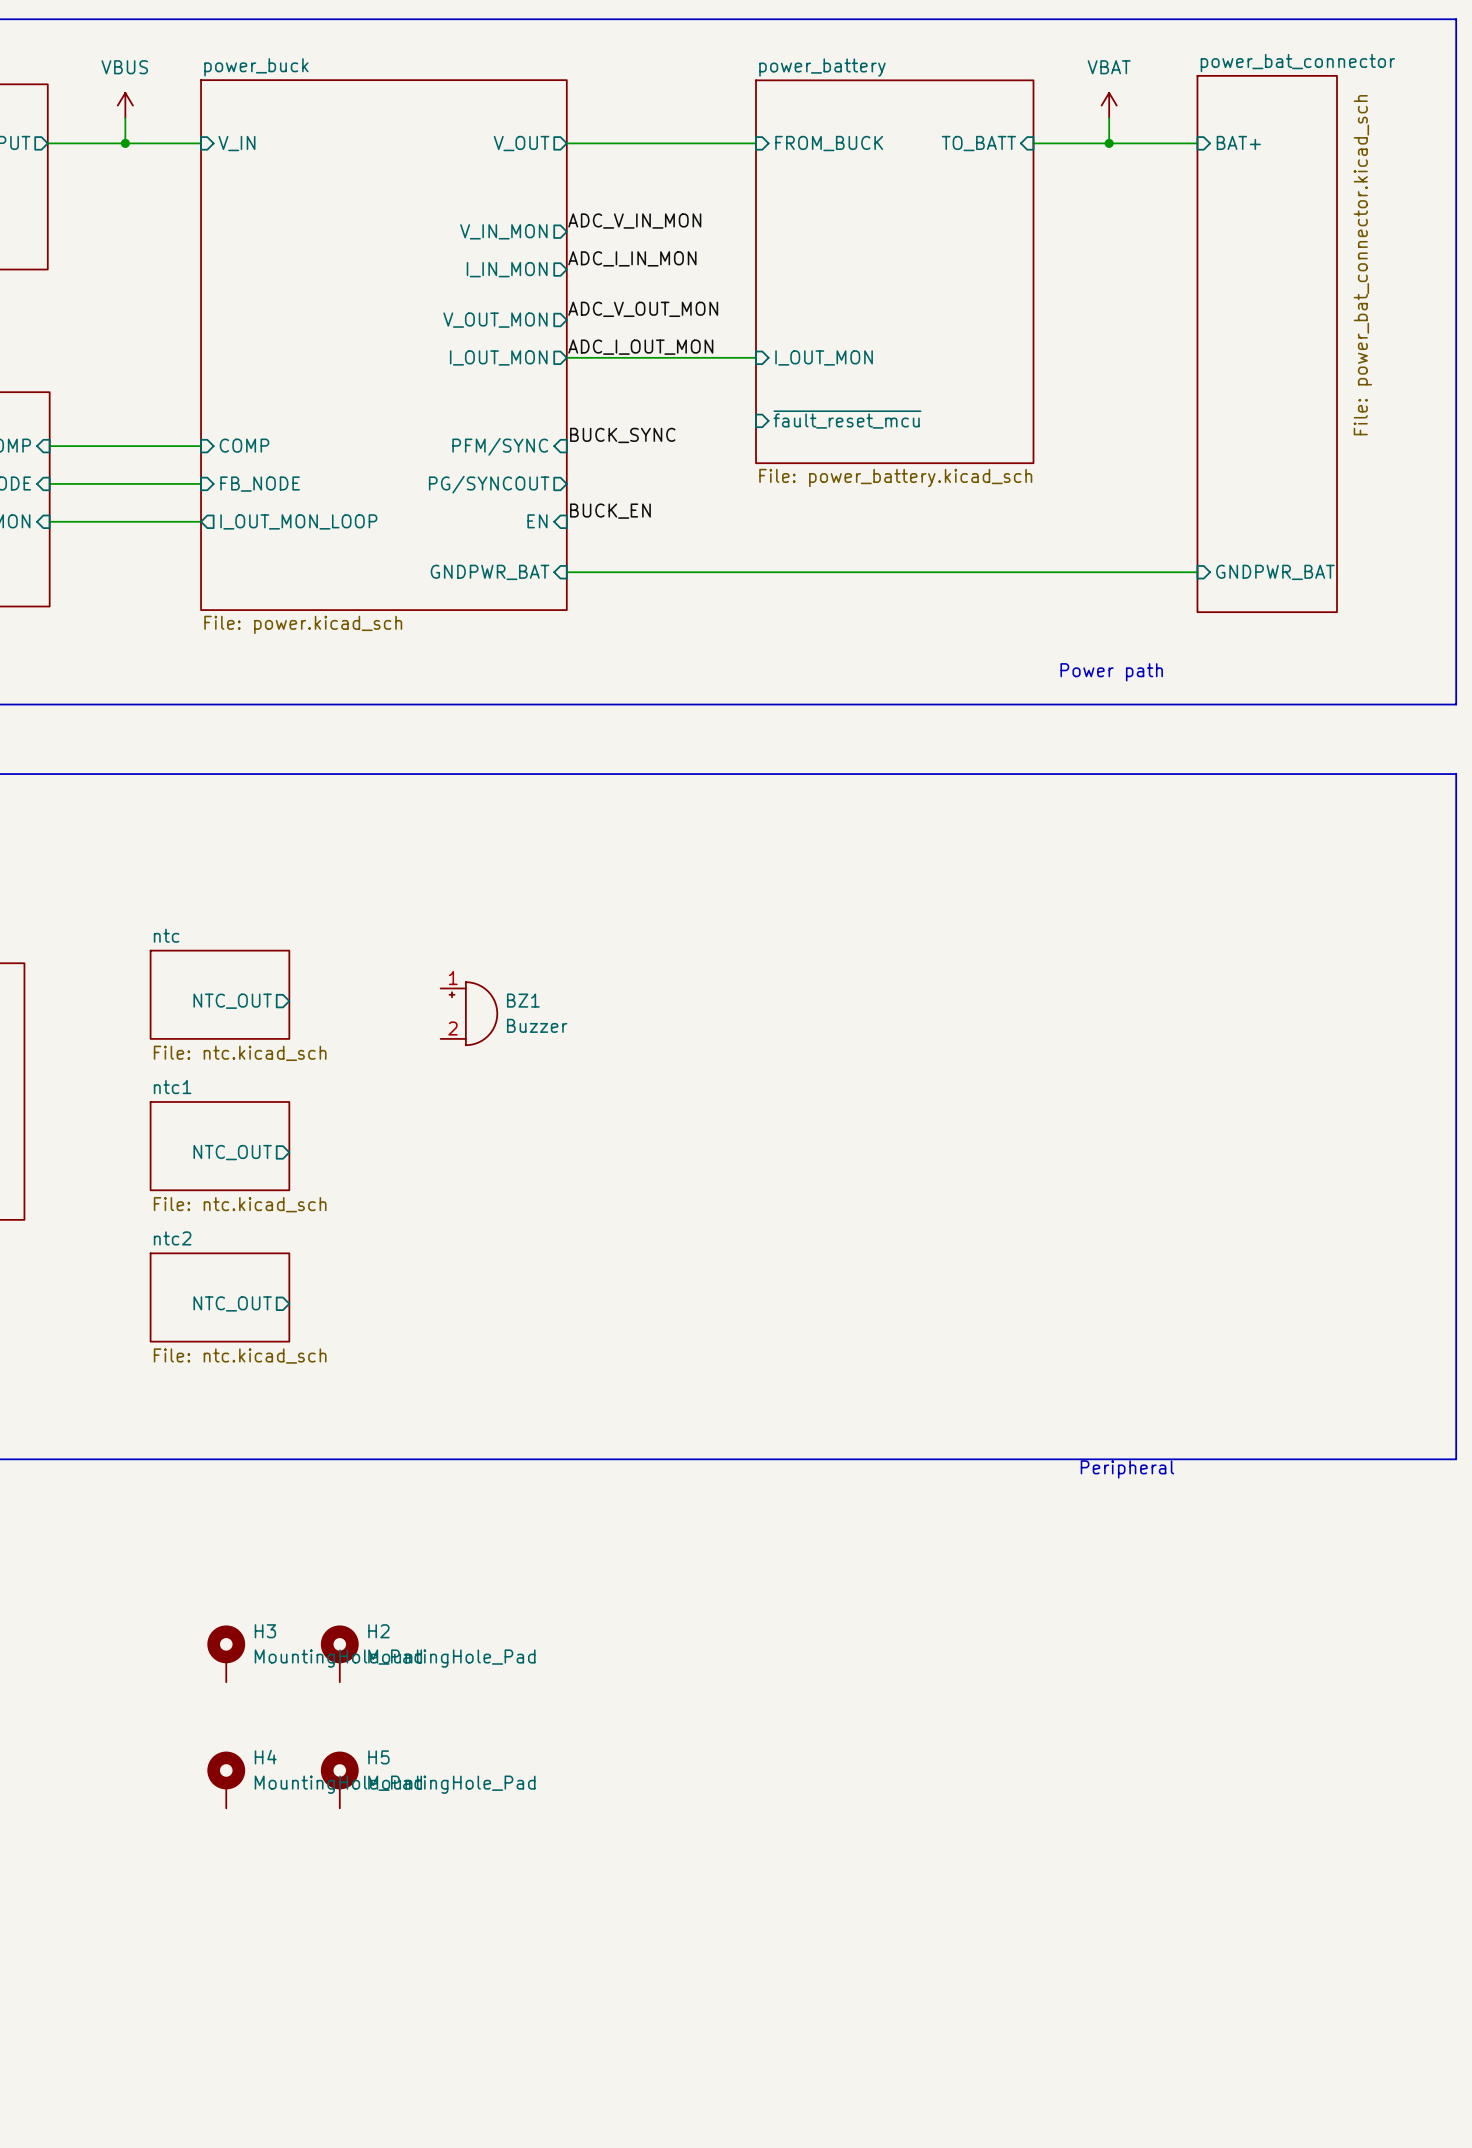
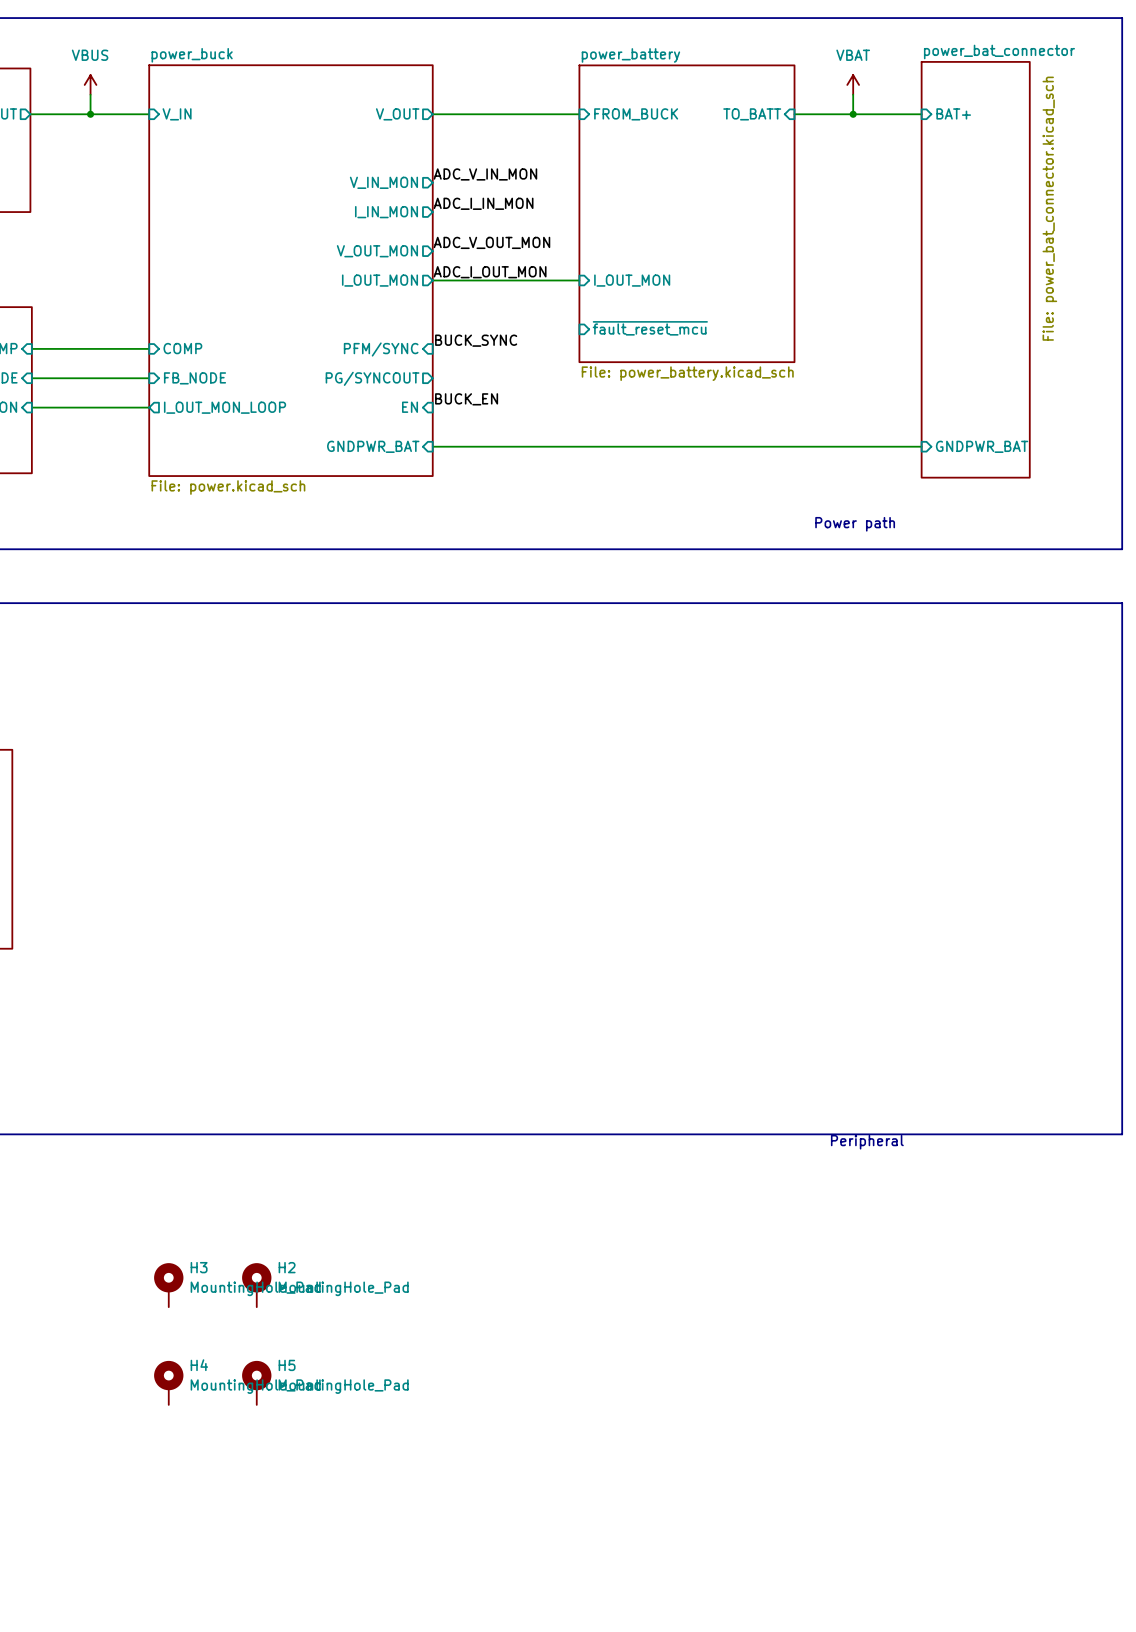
sheet ntc: File: ntc.kicad_sch (219, 994) -> none
sheet pin: NTC_OUT (232, 1001) -> none
BZ1: Buzzer (468, 1013) -> none
sheet ntc1: File: ntc.kicad_sch (219, 1146) -> none
sheet pin: NTC_OUT (232, 1152) -> none
sheet ntc2: File: ntc.kicad_sch (219, 1297) -> none
sheet pin: NTC_OUT (232, 1303) -> none

